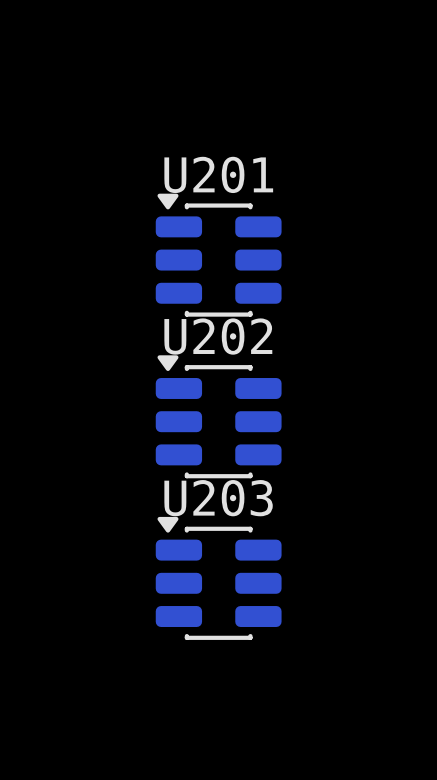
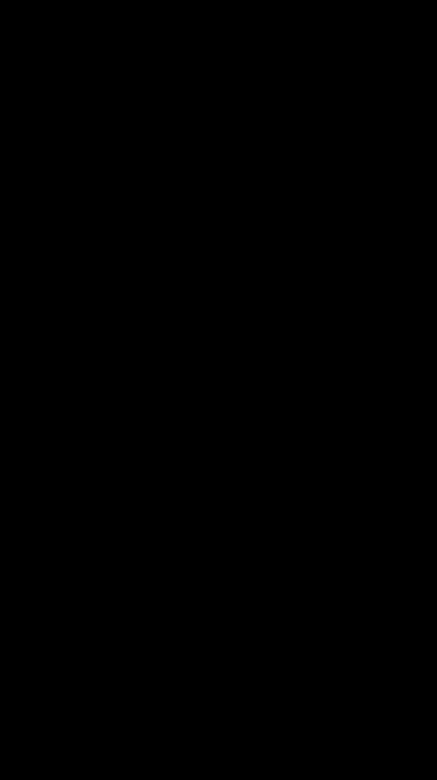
U201: (218, 255) -> none
U202: (218, 416) -> none
U203: (218, 578) -> none

